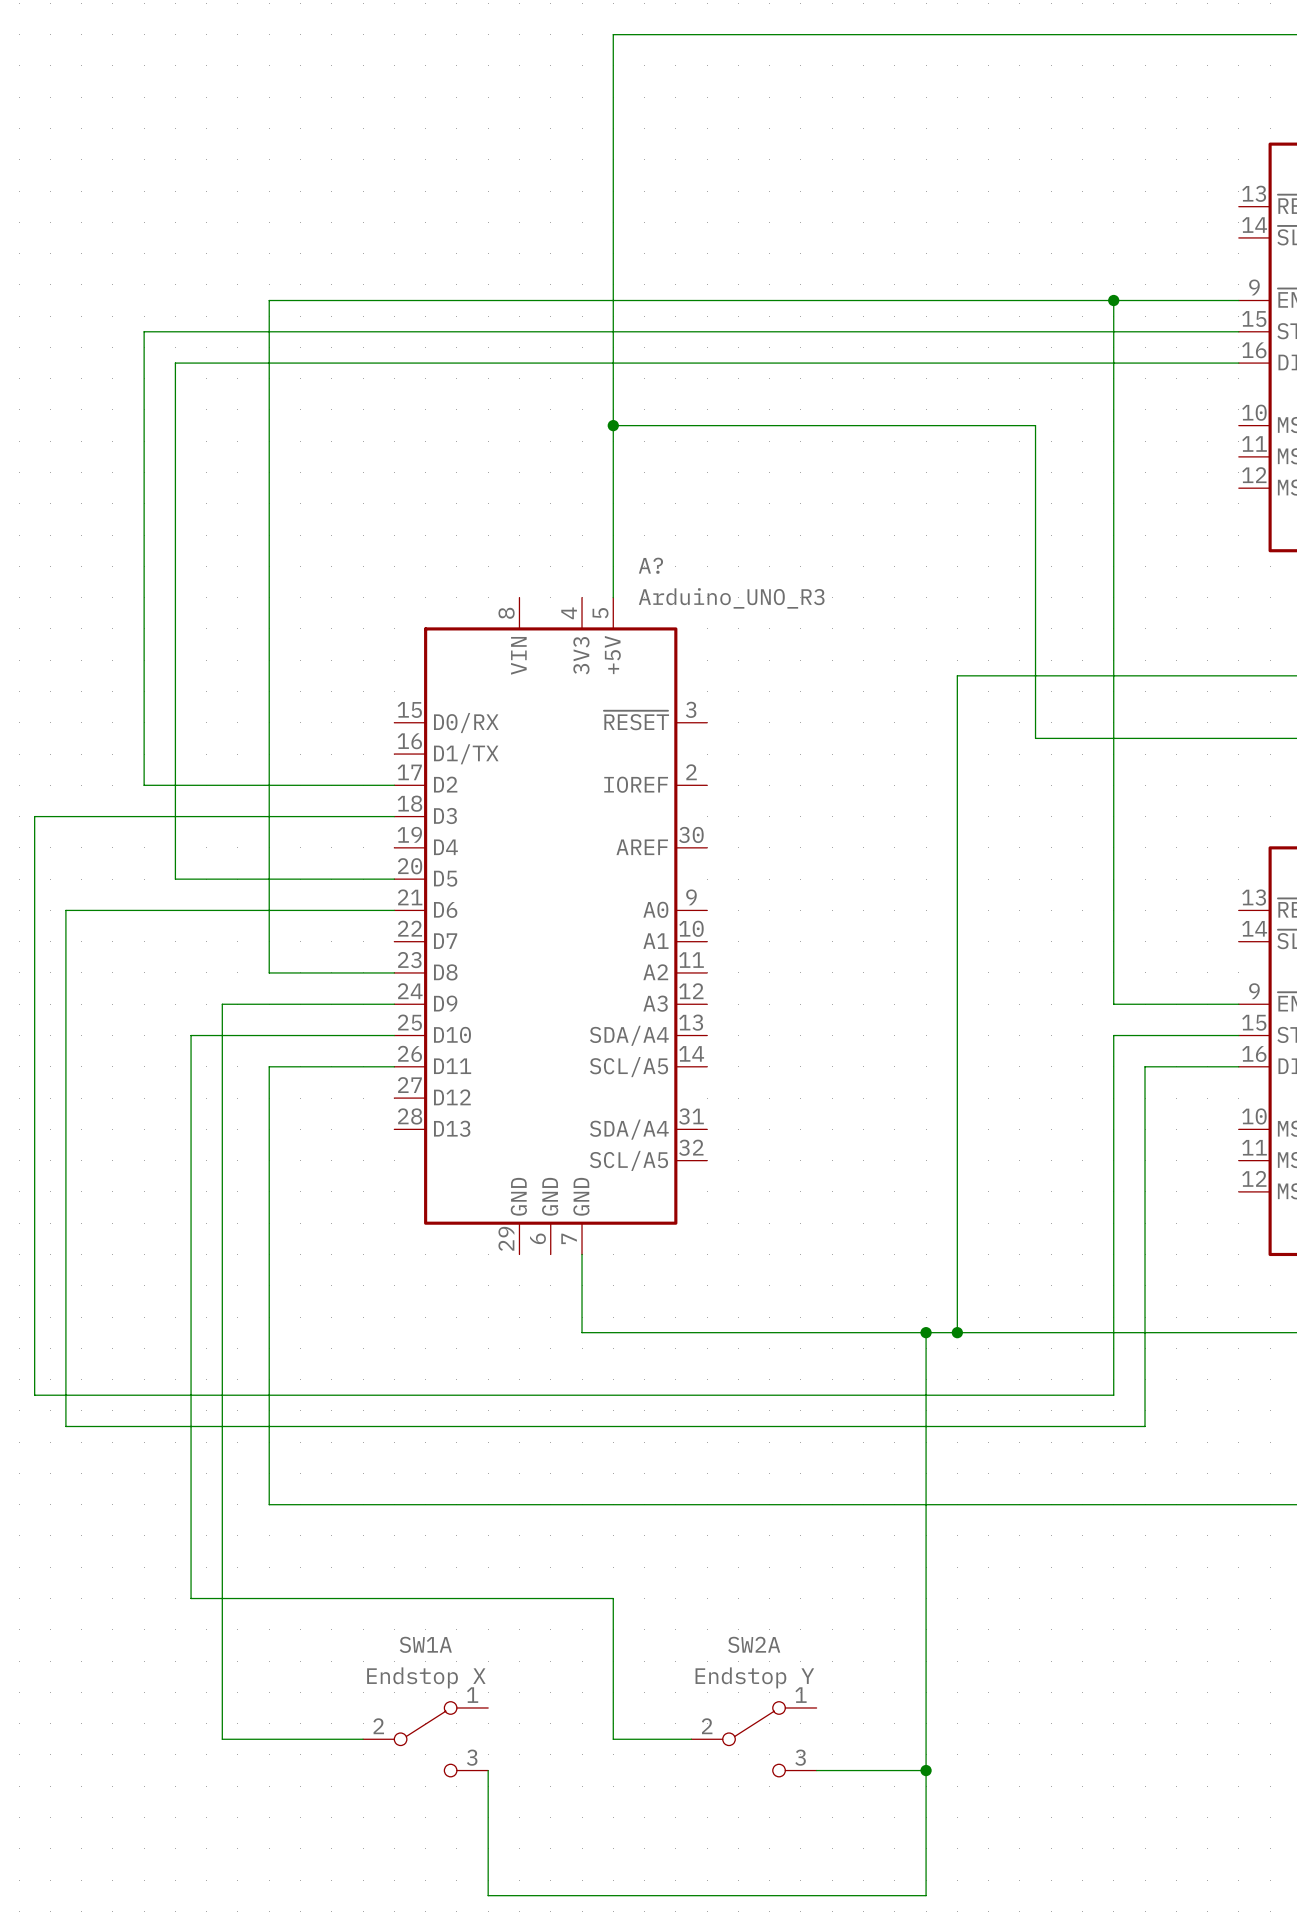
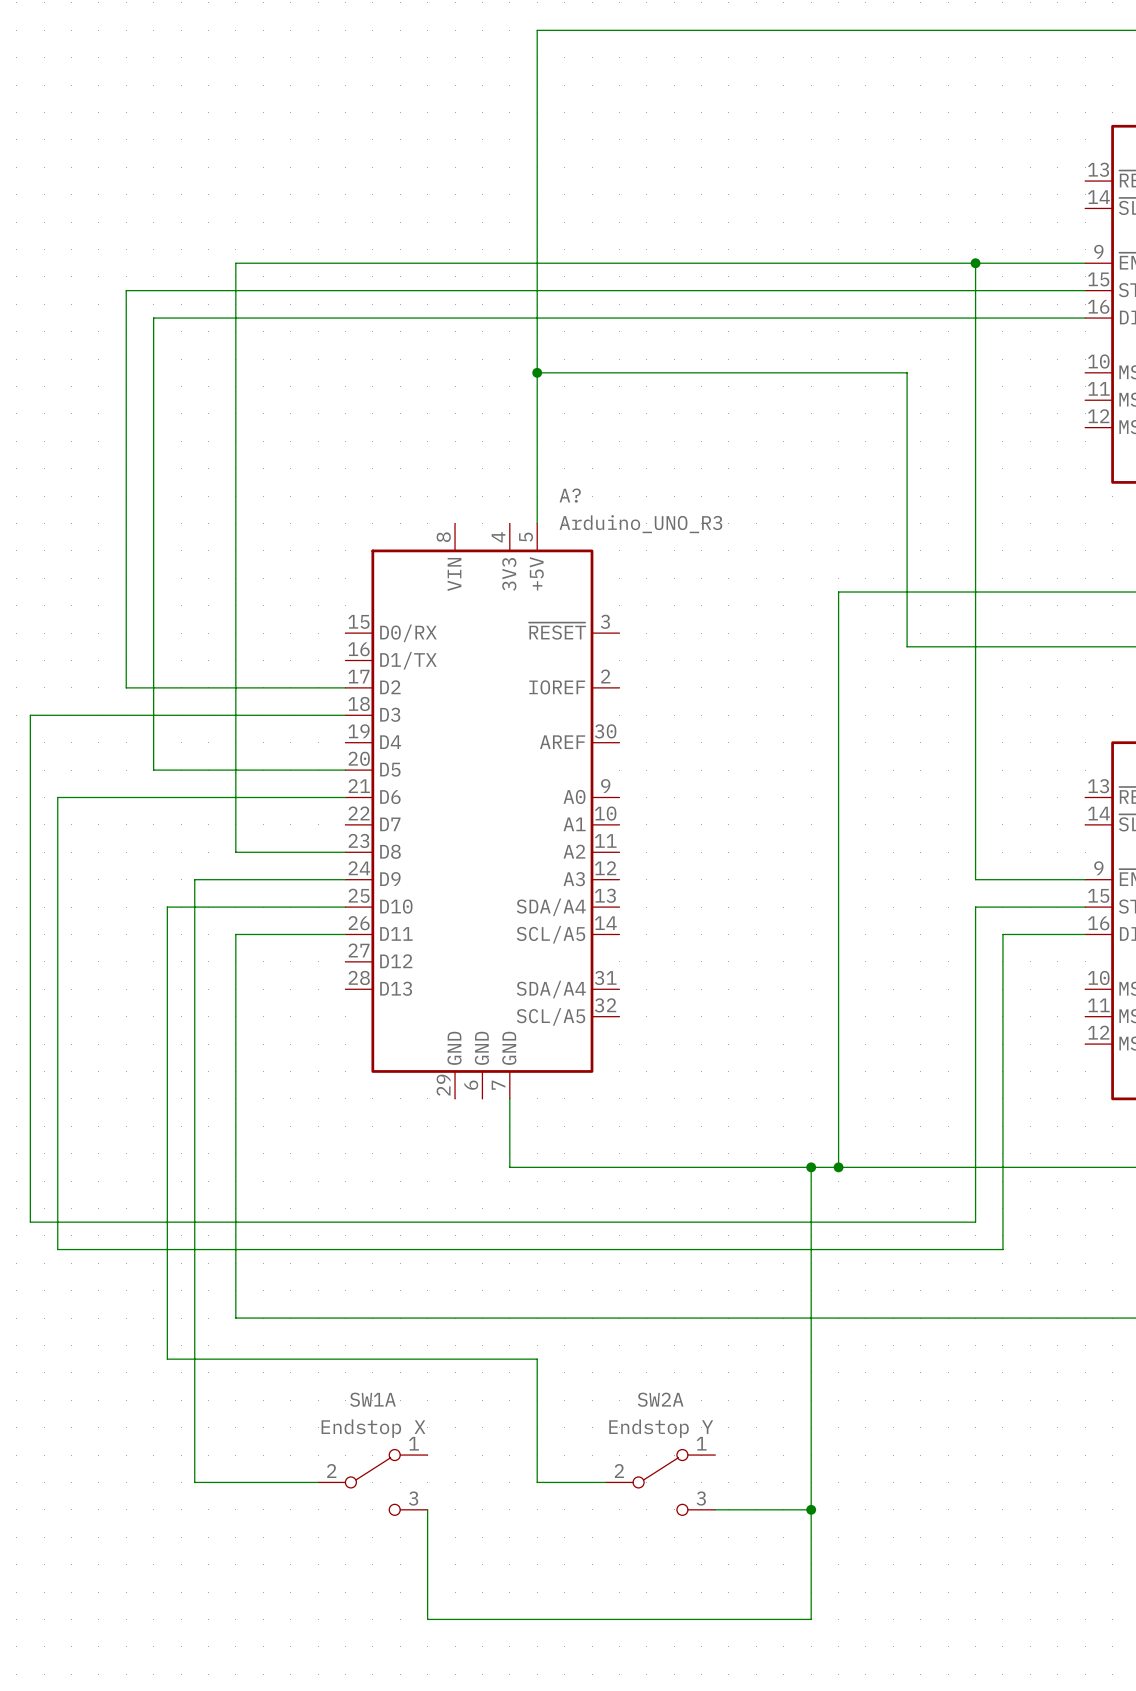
wire: (191, 1551) (191, 1598) (613, 1598) -> (167, 1359) (537, 1359) (537, 1400)
wire: (222, 1692) (222, 1739) (363, 1739) -> (194, 1482) (318, 1482)
wire: (613, 1692) (613, 1739) (691, 1739) -> (537, 1482) (605, 1482)
wire: none -> (427, 1509) (427, 1550)
SW1A position: (425, 1739) -> (372, 1482)
SW2A position: (754, 1739) -> (660, 1482)
wire: (816, 1770) (926, 1770) -> (715, 1509) (811, 1509)
junction position: (926, 1770) -> (811, 1509)
wire: (488, 1848) (488, 1895) (926, 1895) (926, 1848) -> (427, 1619) (811, 1619)

